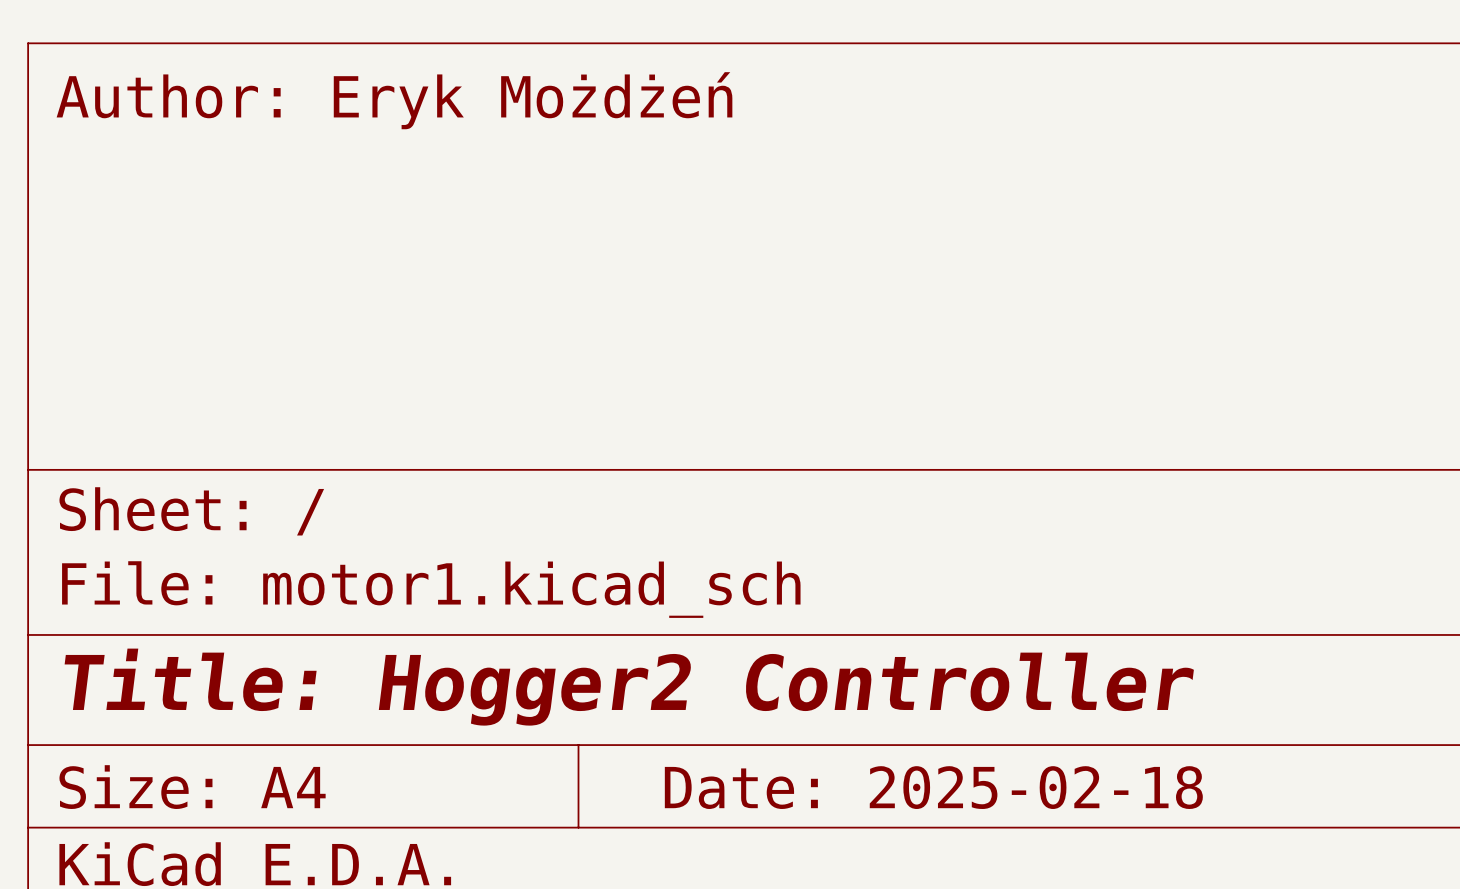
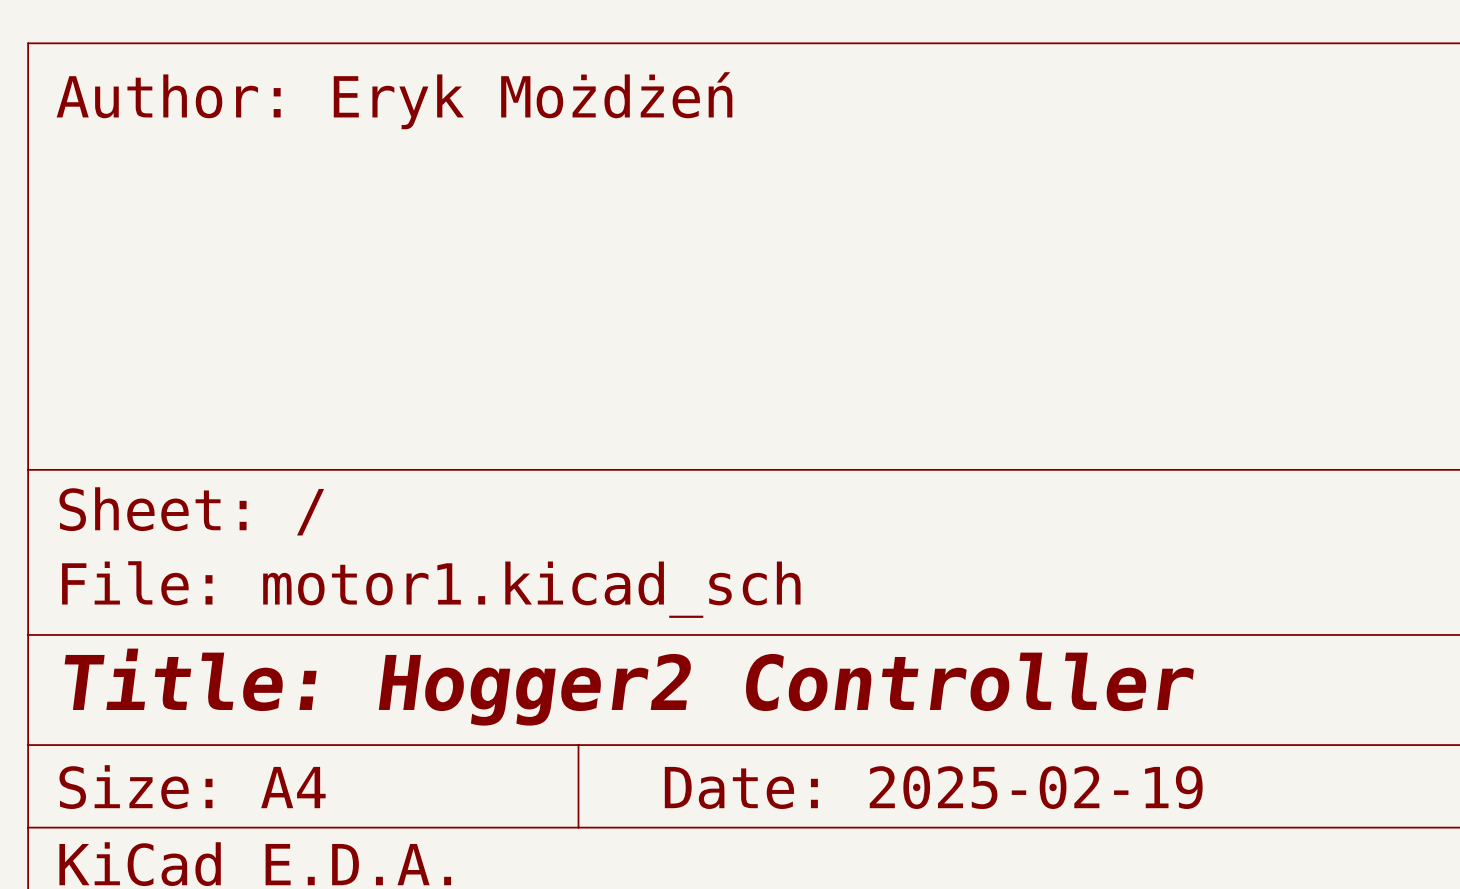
title block: Date: 2025-02-18 (933, 787) -> Date: 2025-02-19 (933, 787)

